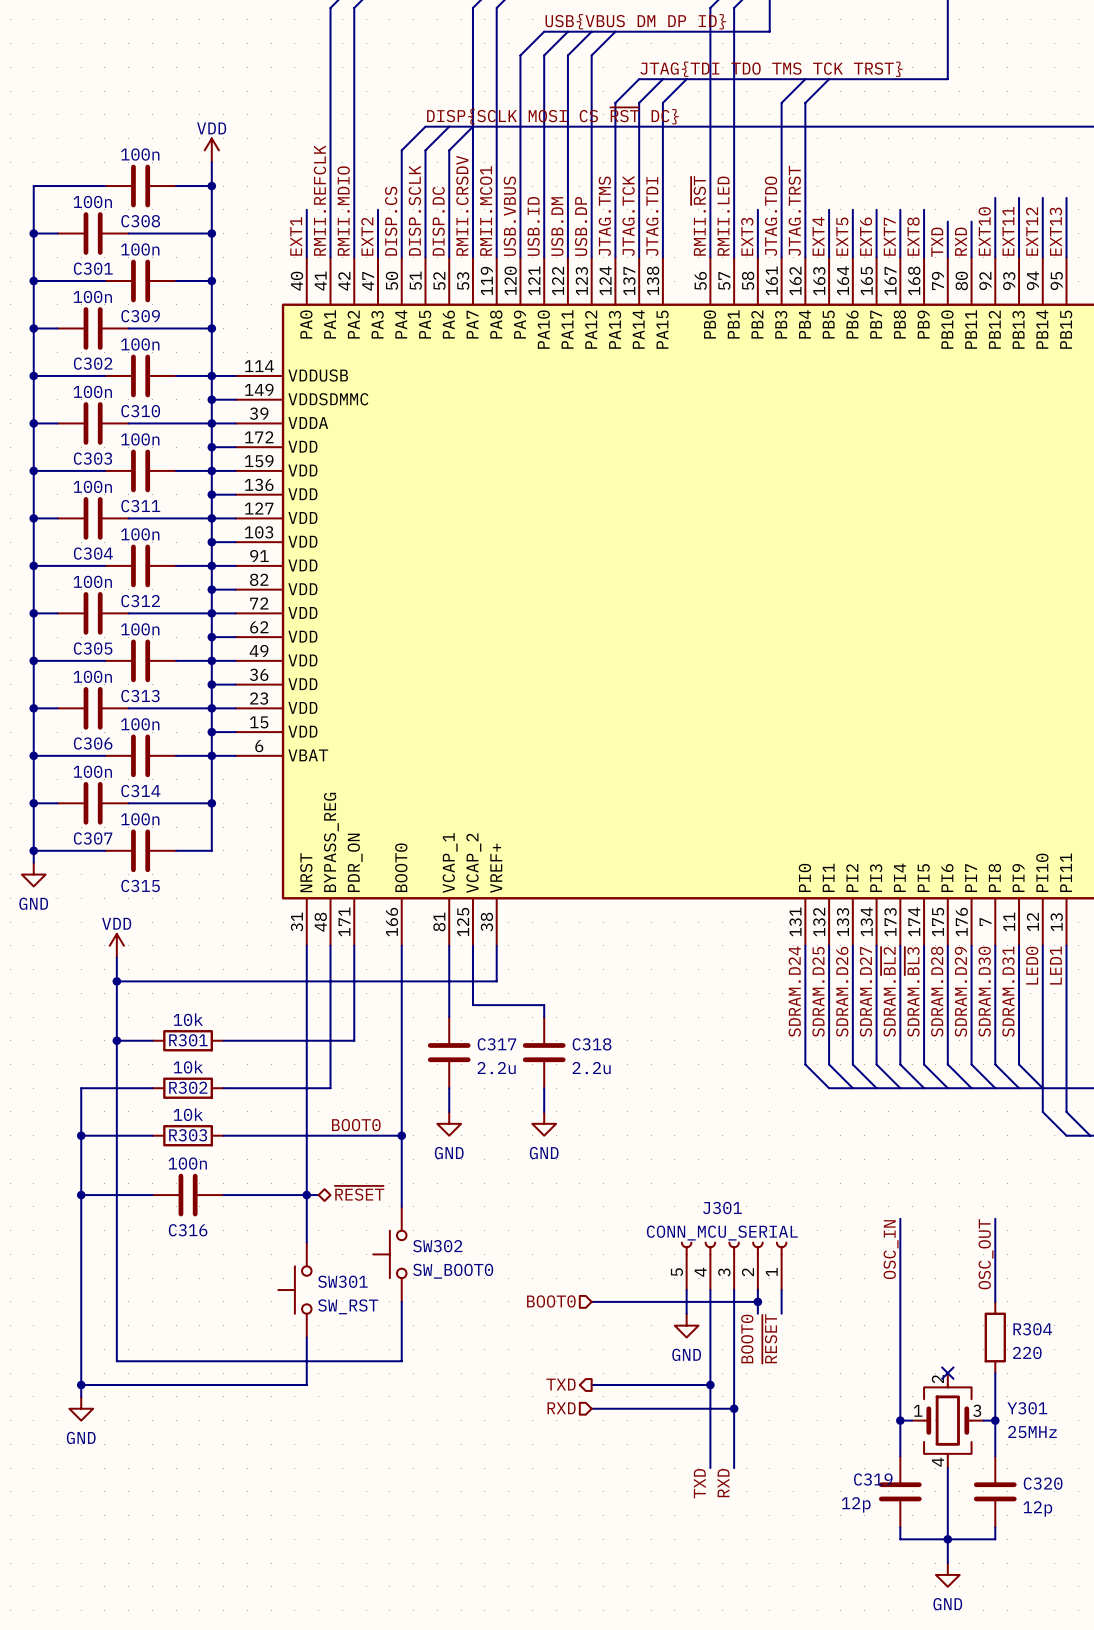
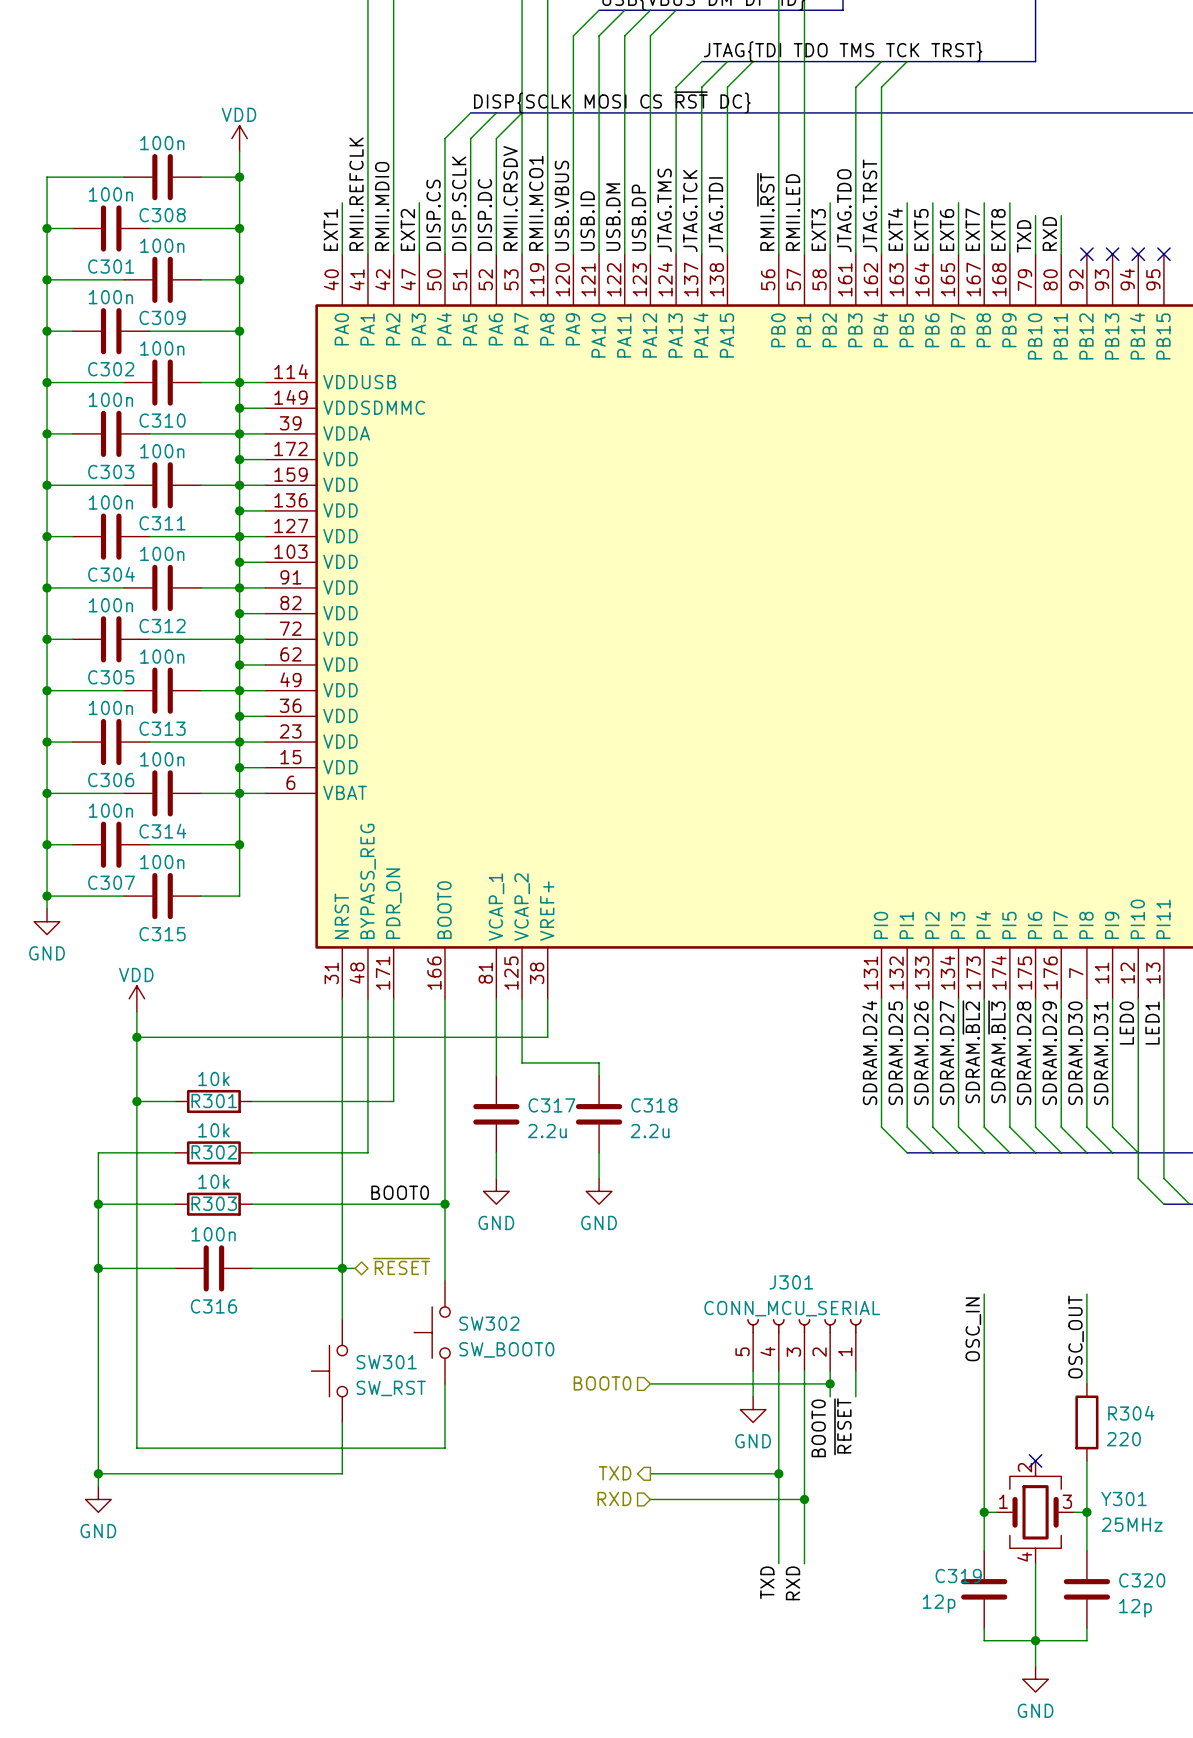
wire: (995, 197) (995, 257) -> none
wire: (1019, 197) (1019, 257) -> none
wire: (1042, 197) (1042, 257) -> none
wire: (1066, 197) (1066, 257) -> none
label: EXT10 (984, 231) -> none
label: EXT11 (1008, 231) -> none
label: EXT12 (1032, 231) -> none
label: EXT13 (1055, 231) -> none
no-connect mark: none -> (1086, 254)
no-connect mark: none -> (1112, 254)
no-connect mark: none -> (1138, 254)
no-connect mark: none -> (1163, 254)

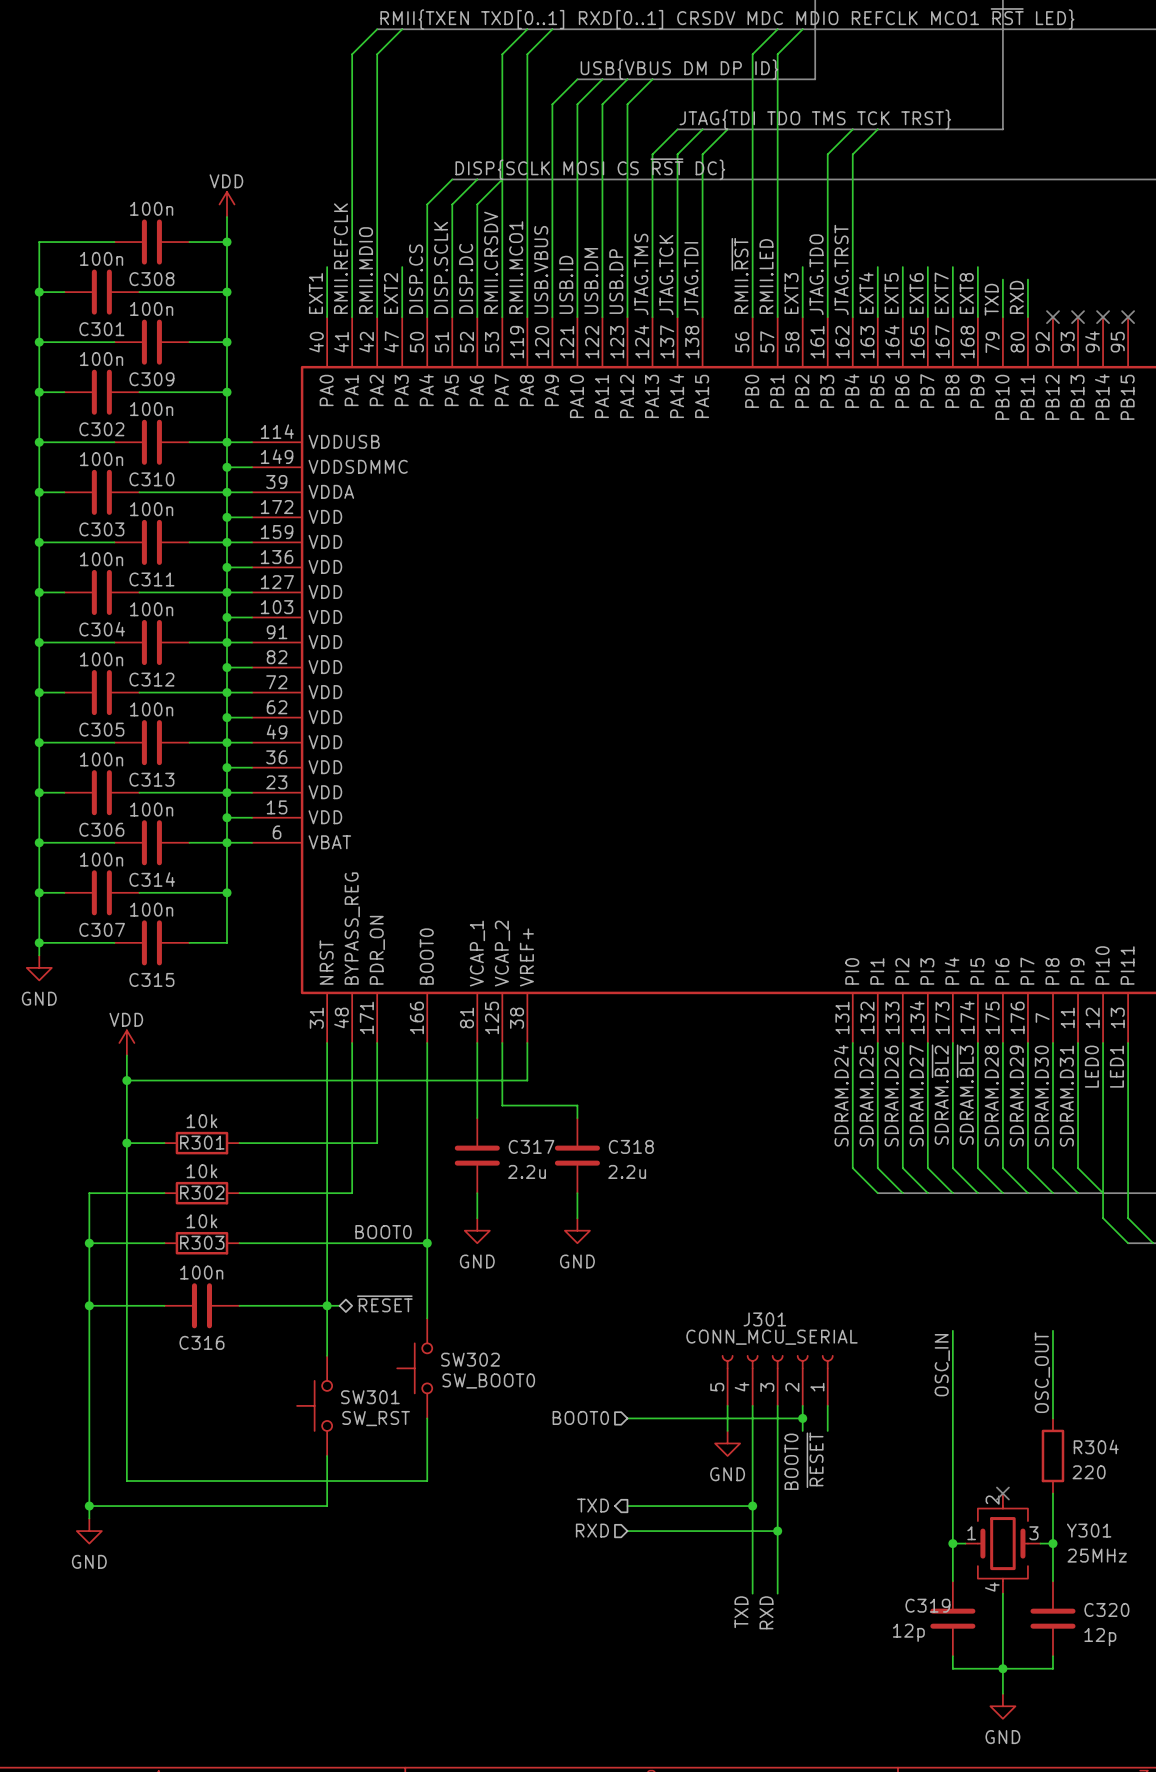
J301 text: none -> CONN_MCU_SERIAL (772, 1337)
J301 value: CONN_MCU_SERIAL (792, 1308) -> none
SW302 text: none -> SW_BOOT0 (488, 1381)
SW302 value: SW_BOOT0 (506, 1349) -> none
SW301 text: none -> SW_RST (376, 1418)
SW301 value: SW_RST (391, 1388) -> none

